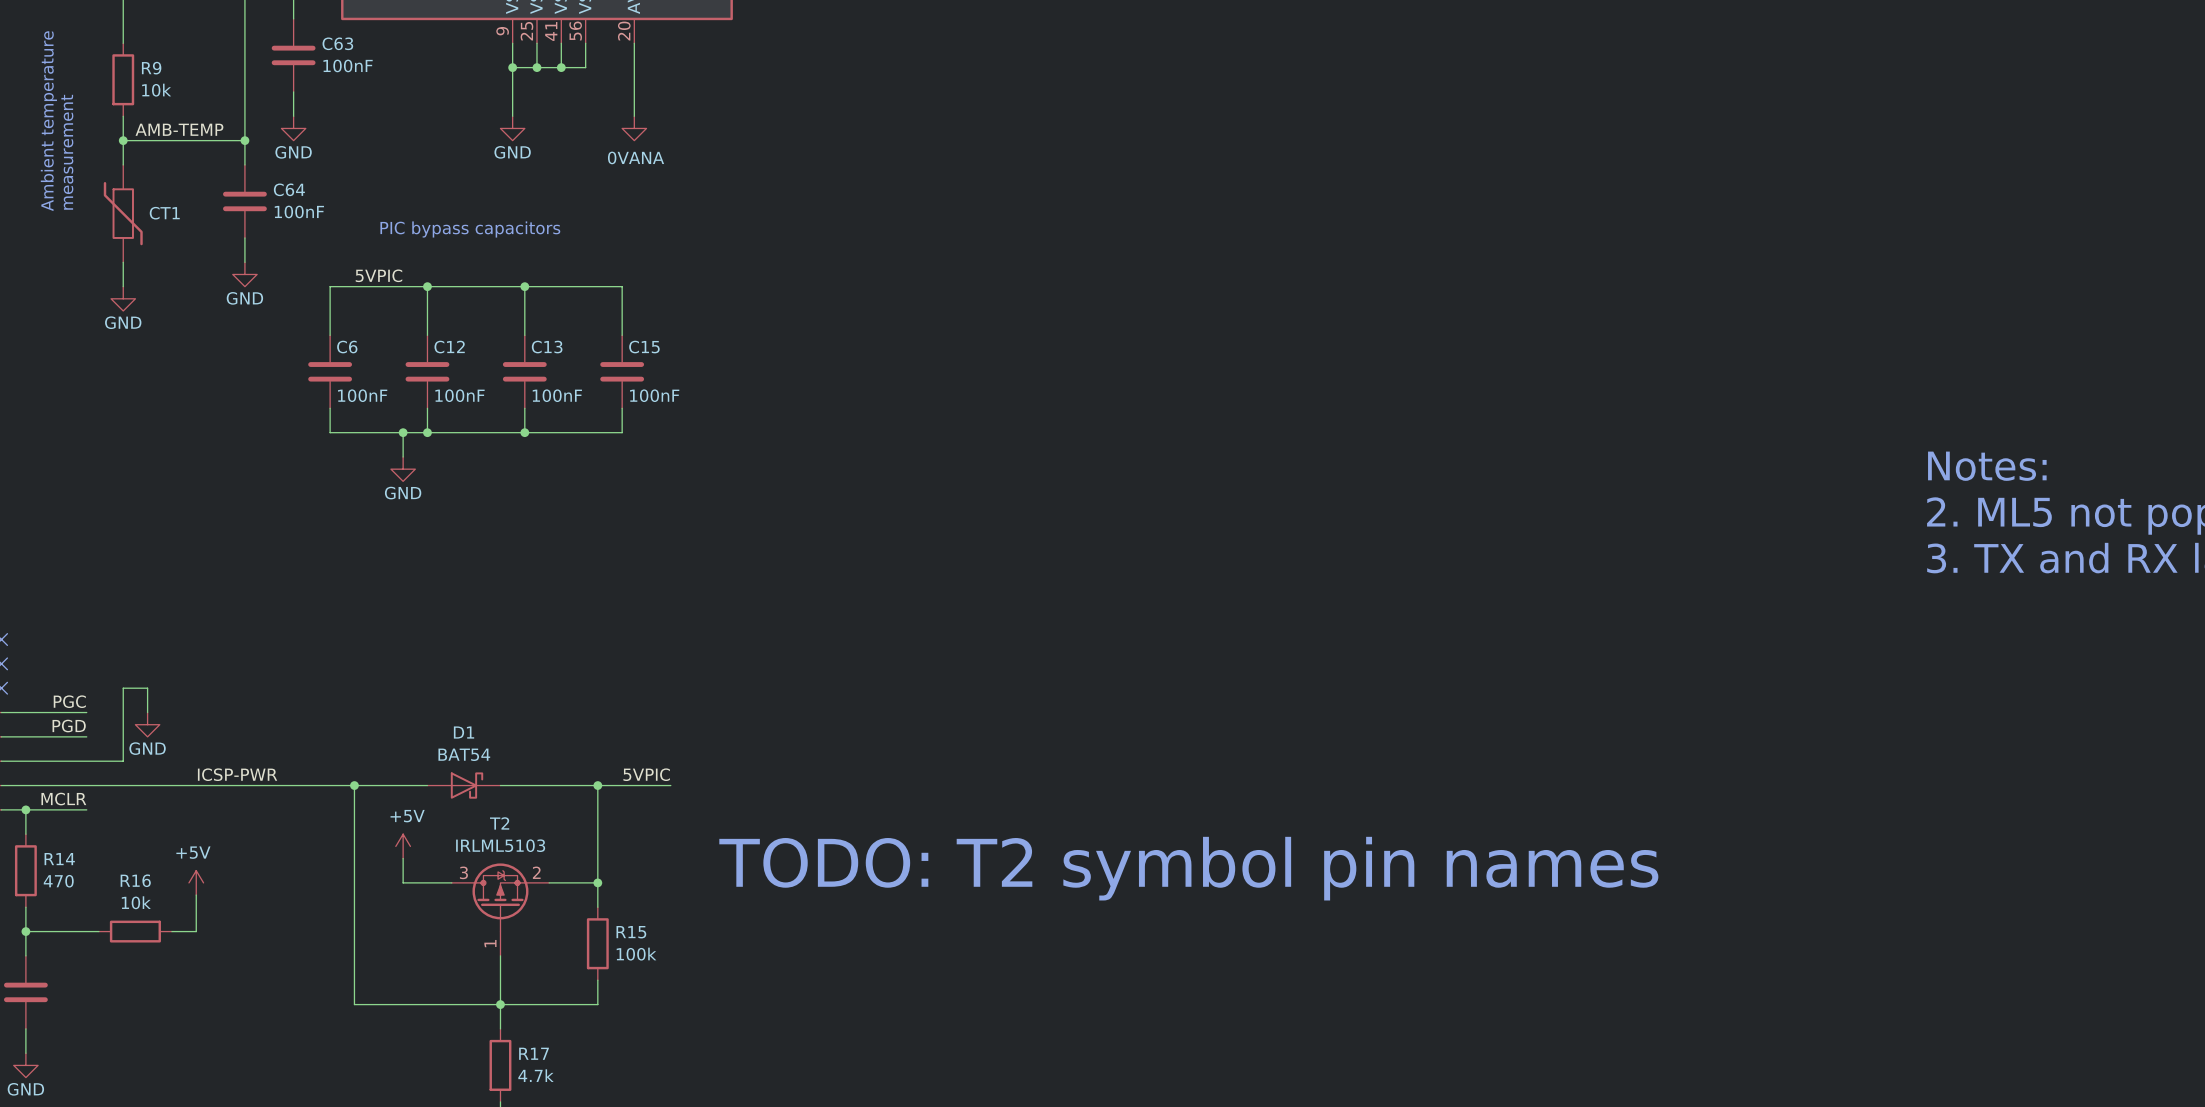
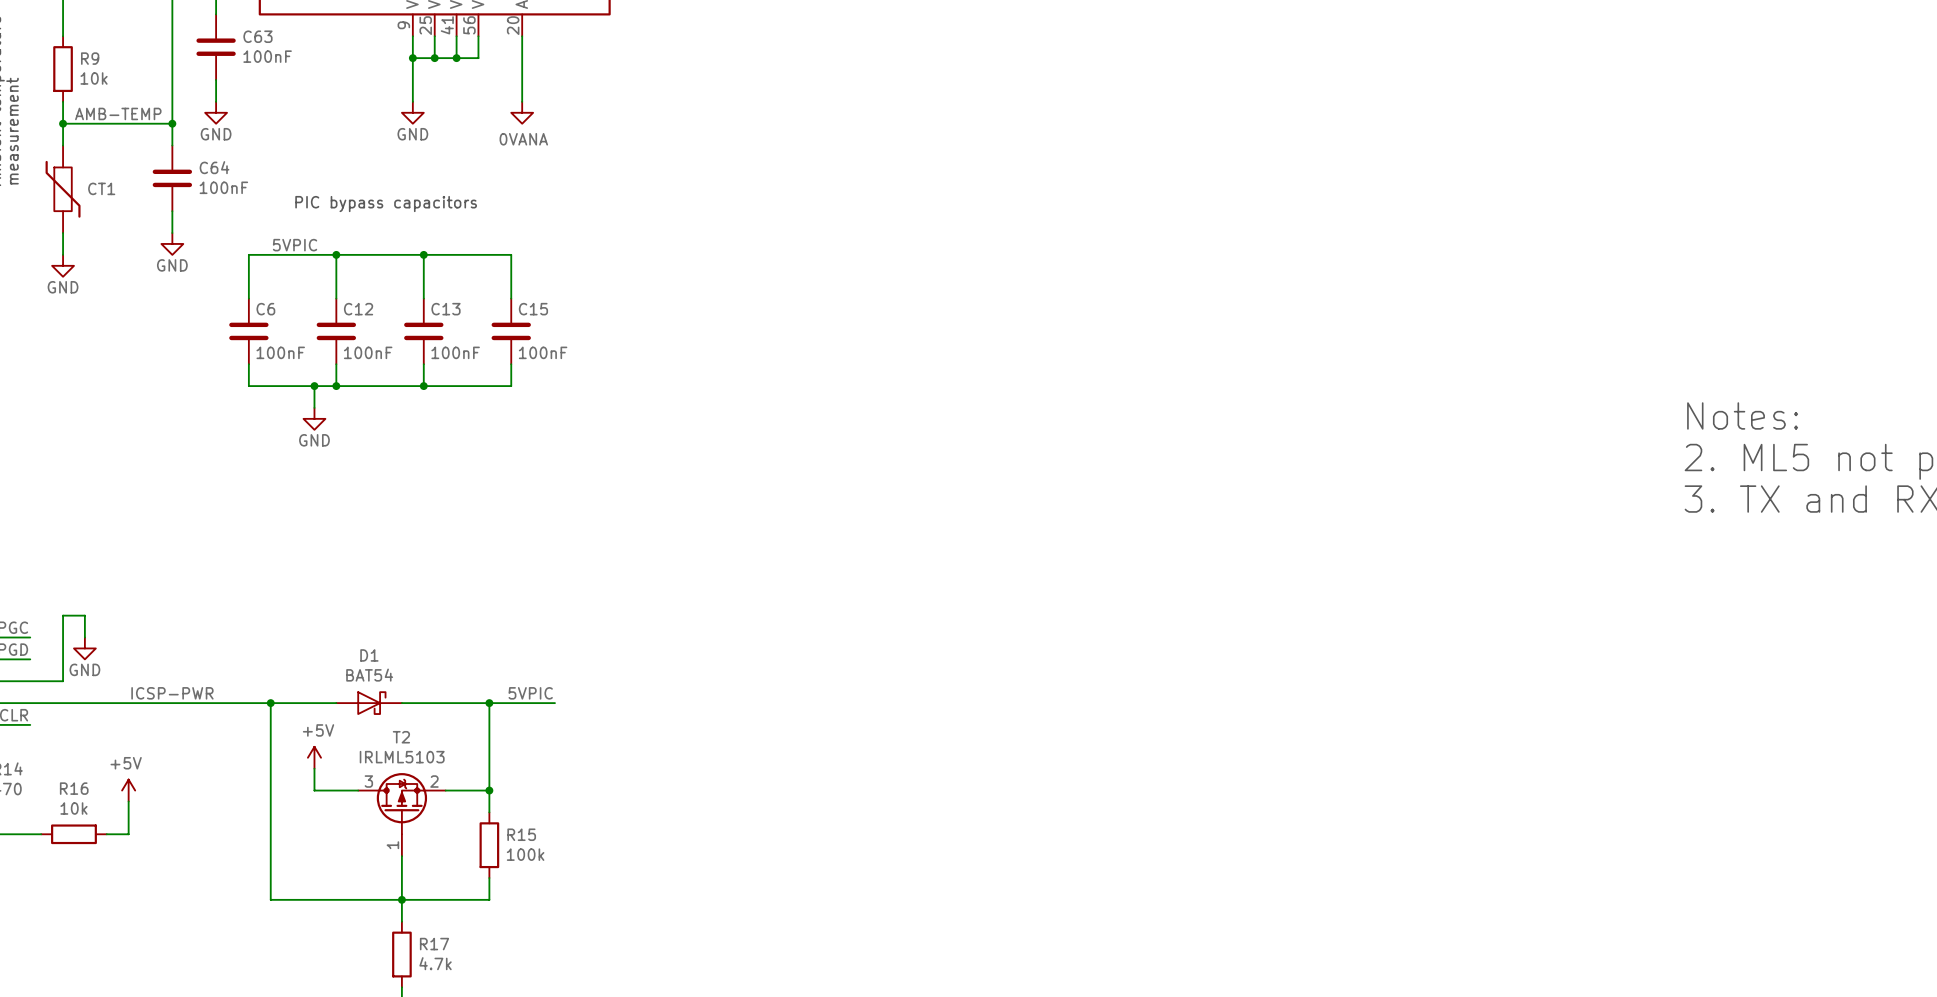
text: TODO: T2 symbol pin names (1188, 868) -> none

